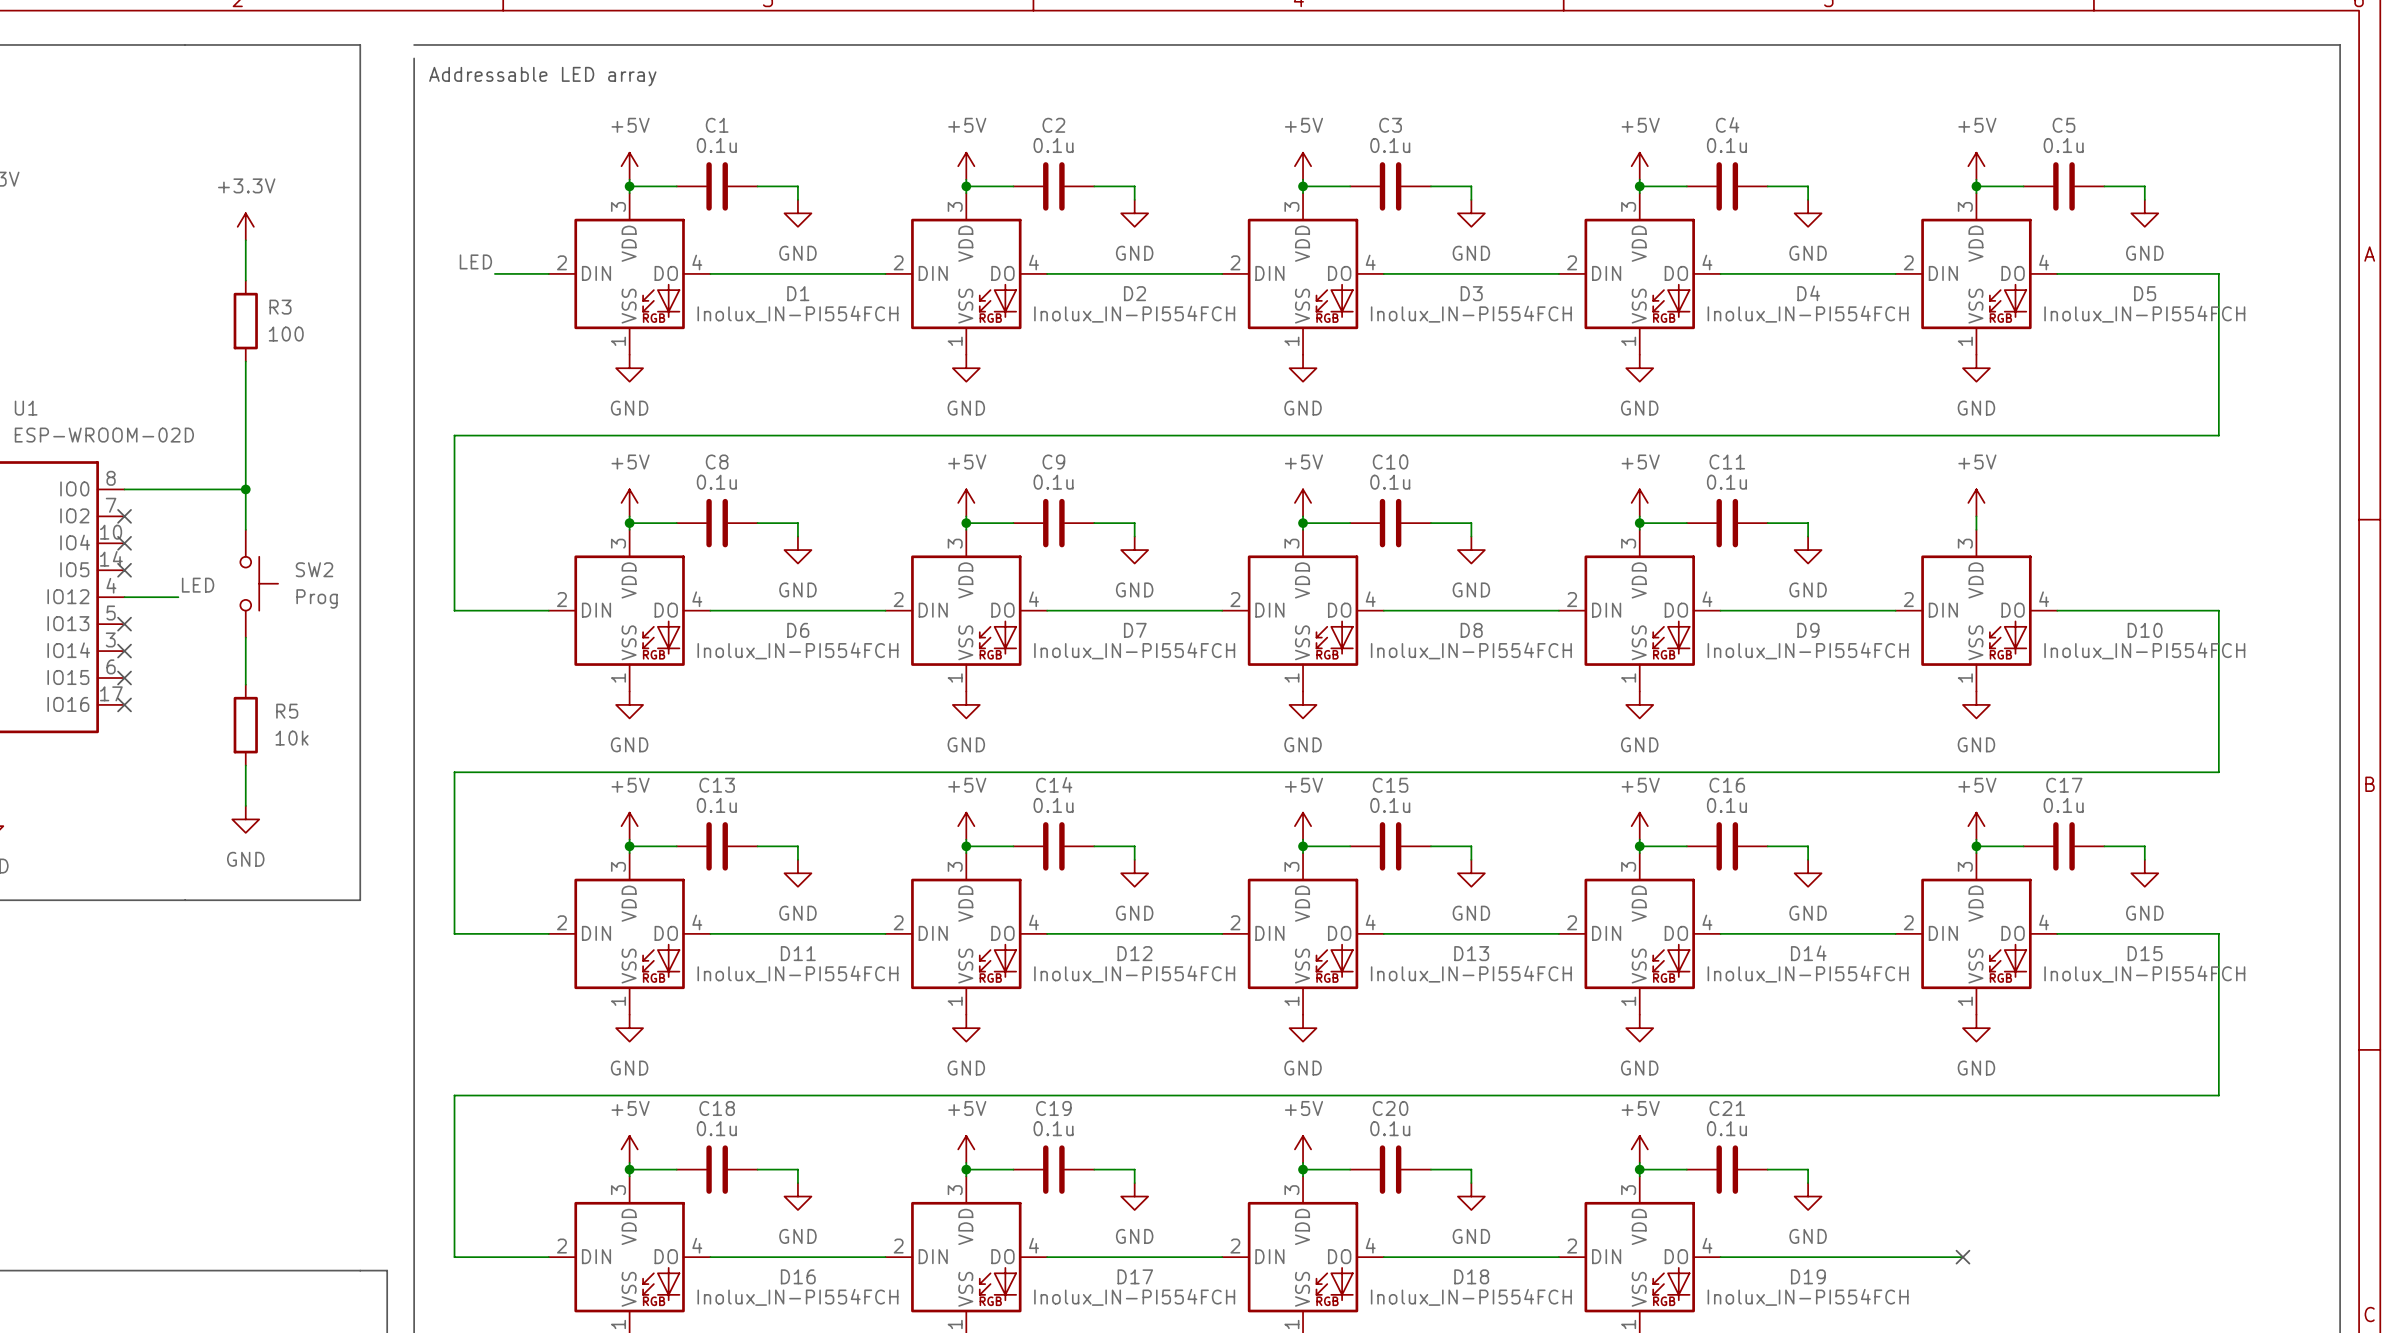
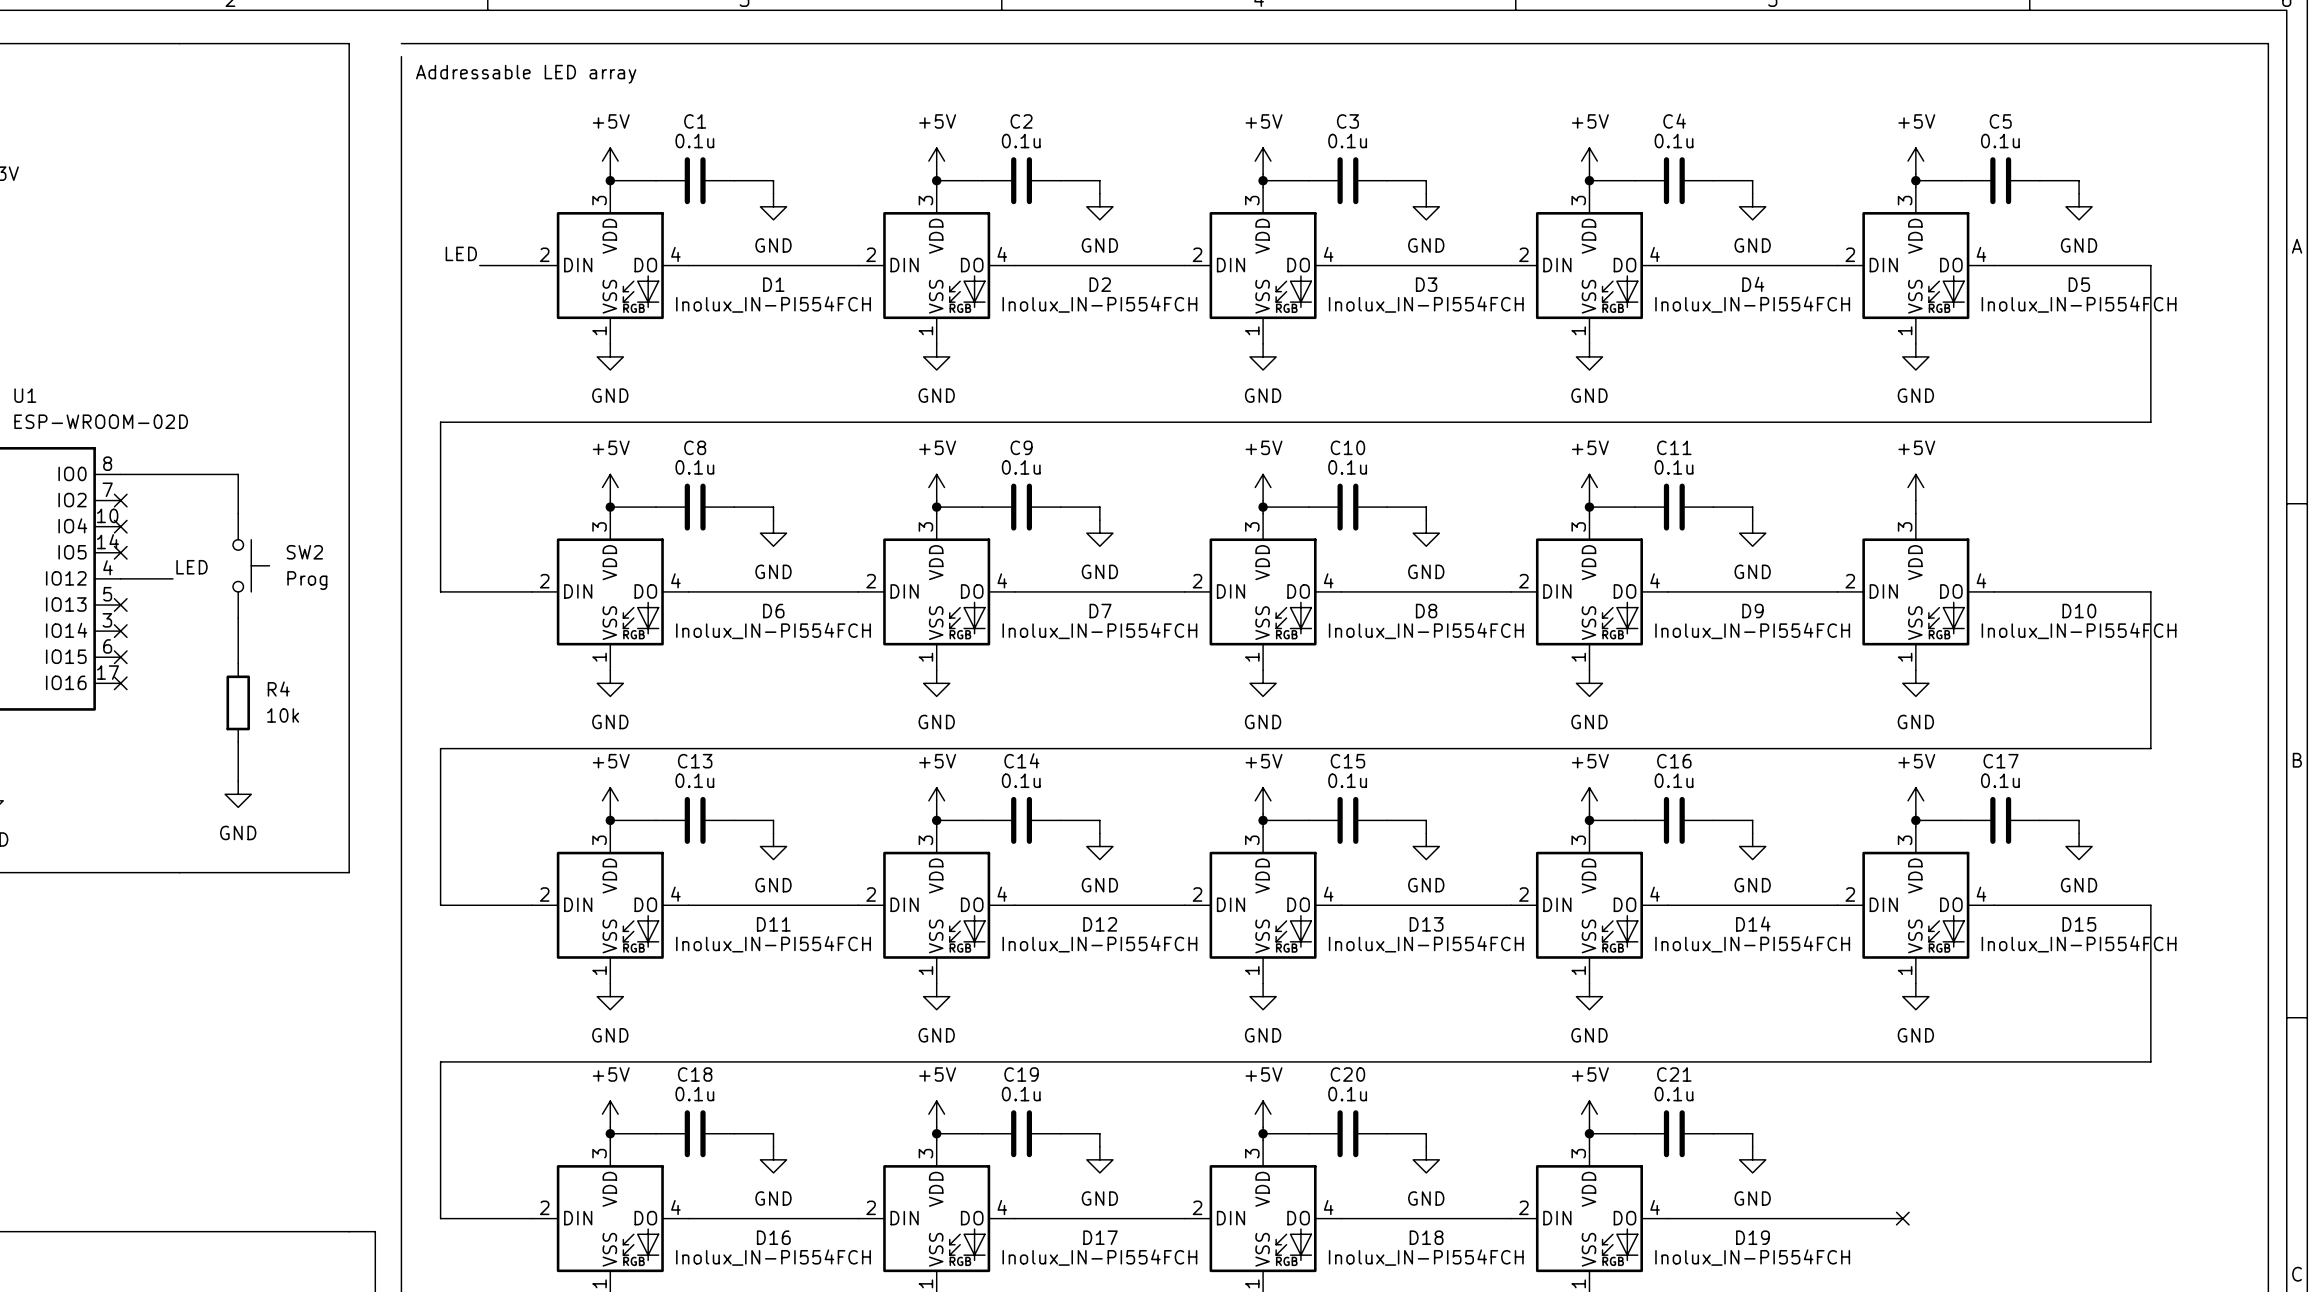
power symbol: +3.3V (245, 226) -> none
wire: (245, 240) (245, 280) -> none
R3: 100 (245, 321) -> none
wire: (245, 361) (245, 489) -> none
junction: (245, 489) -> none
R5 name: R5 (287, 711) -> R4 (278, 689)

